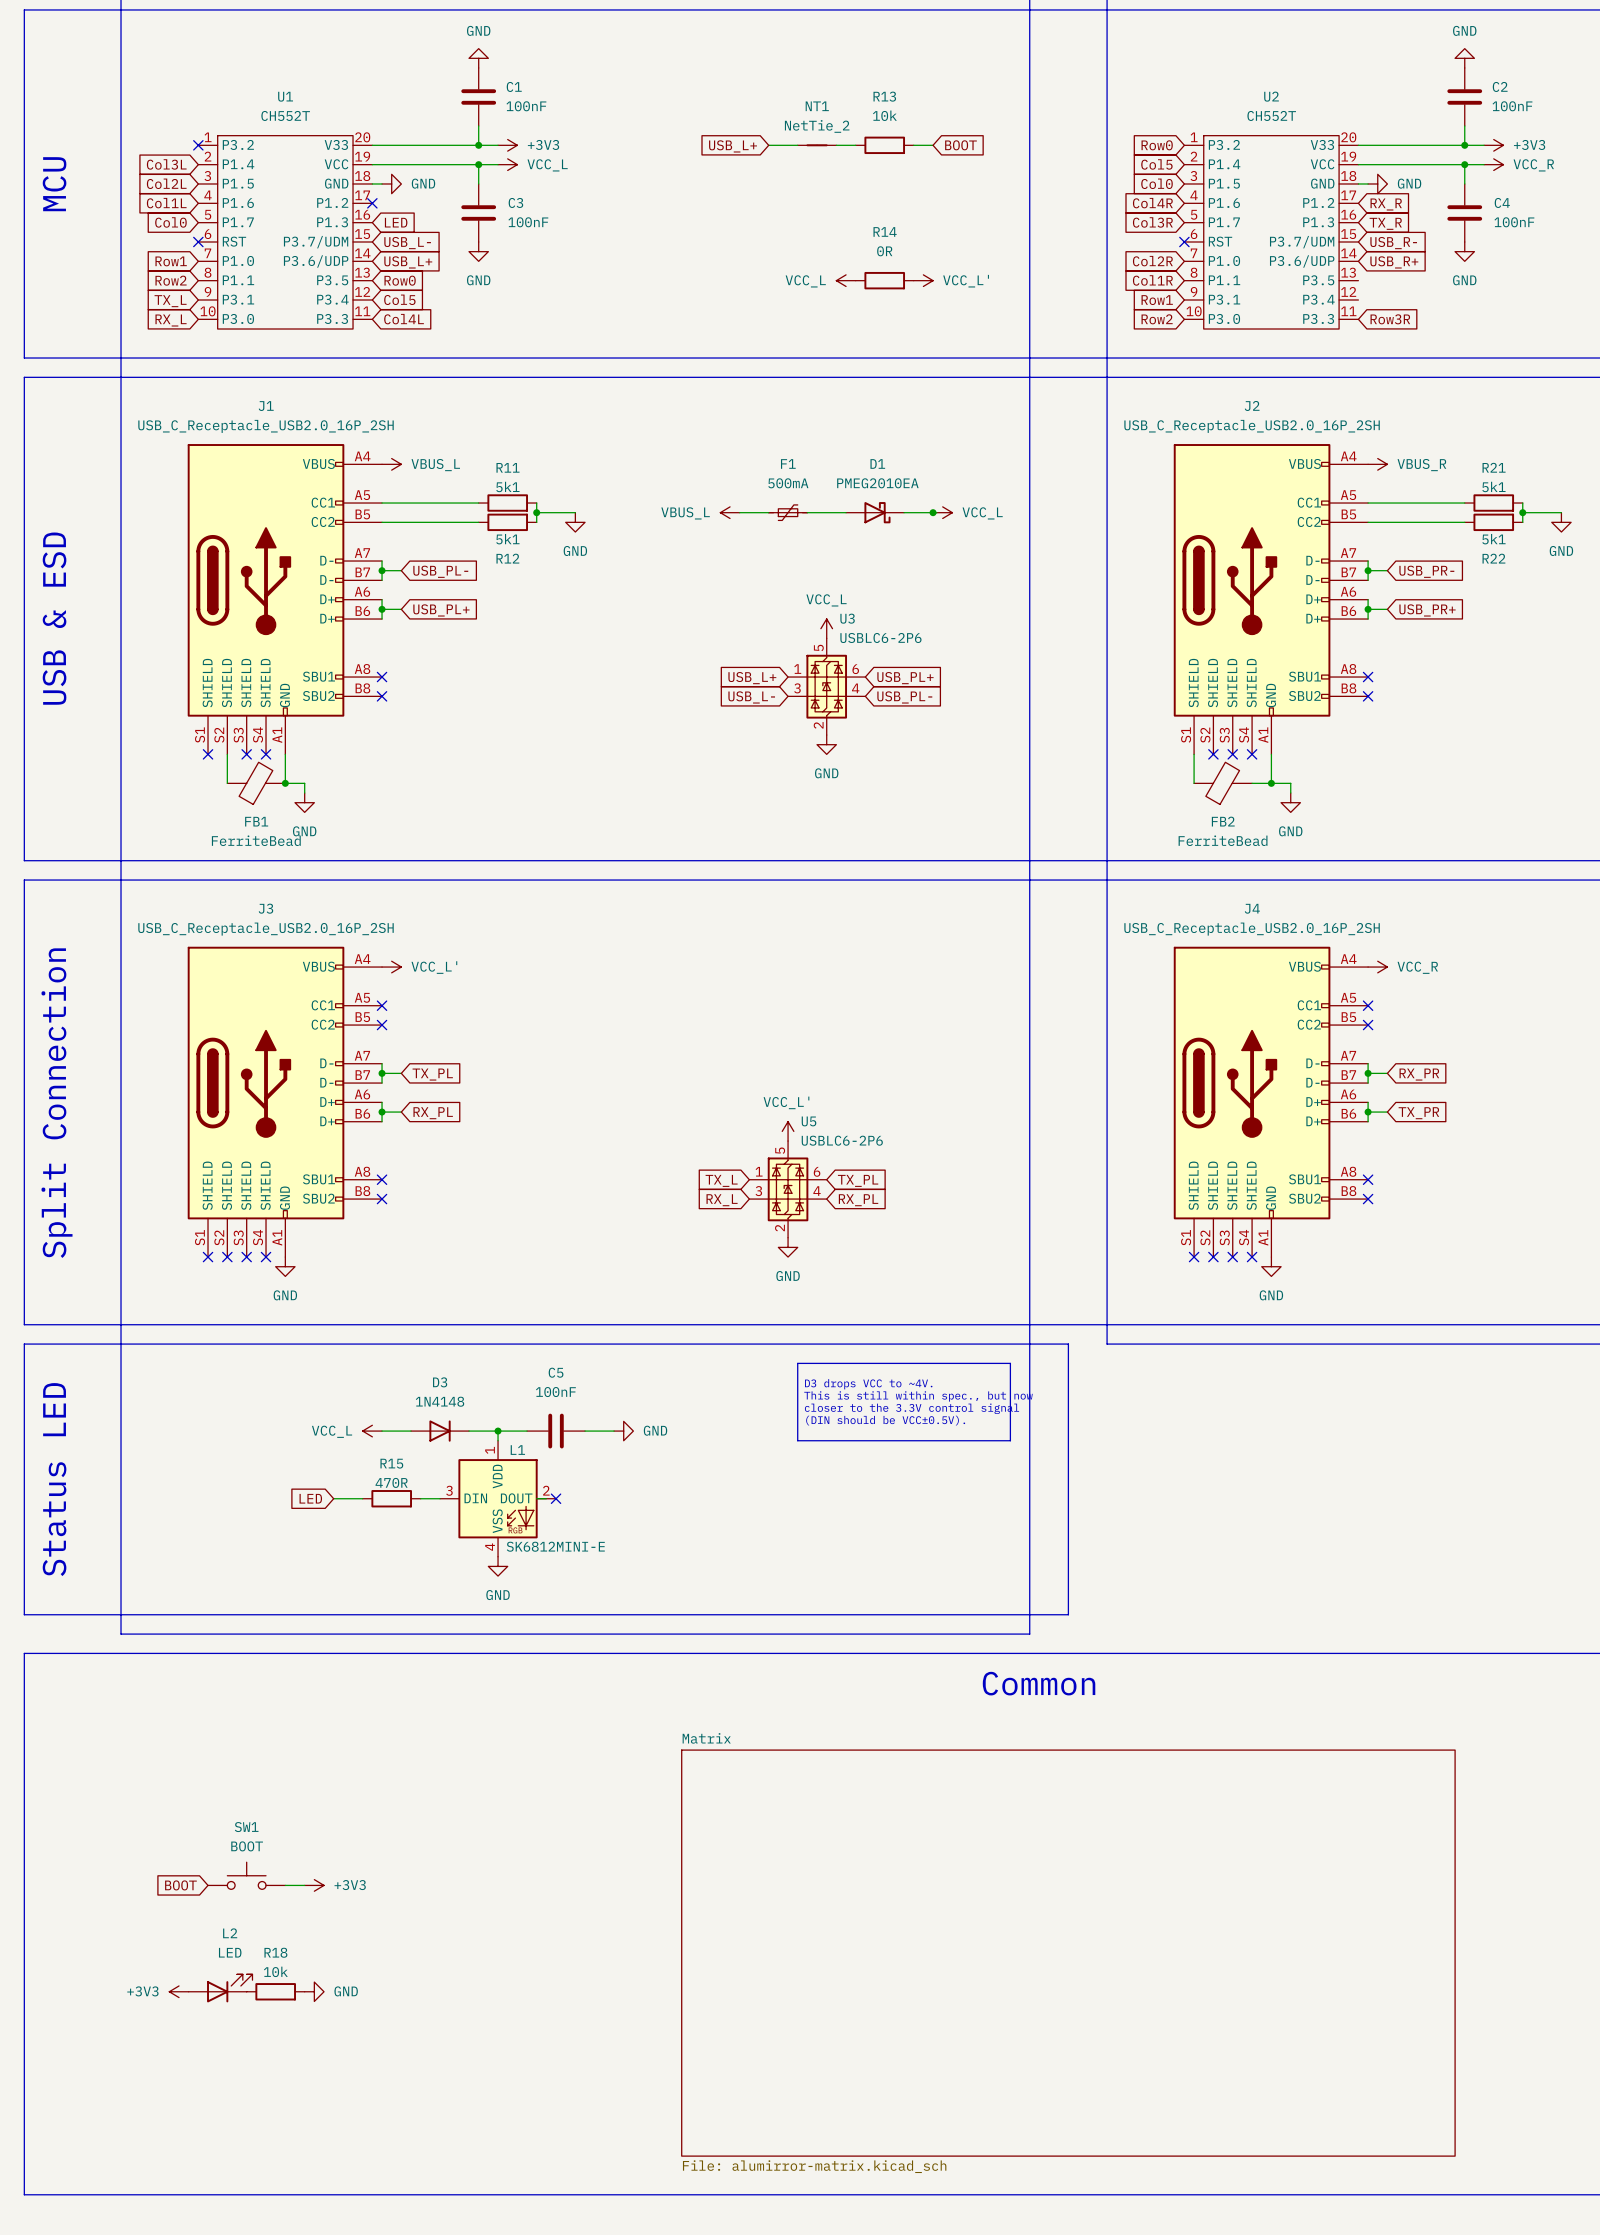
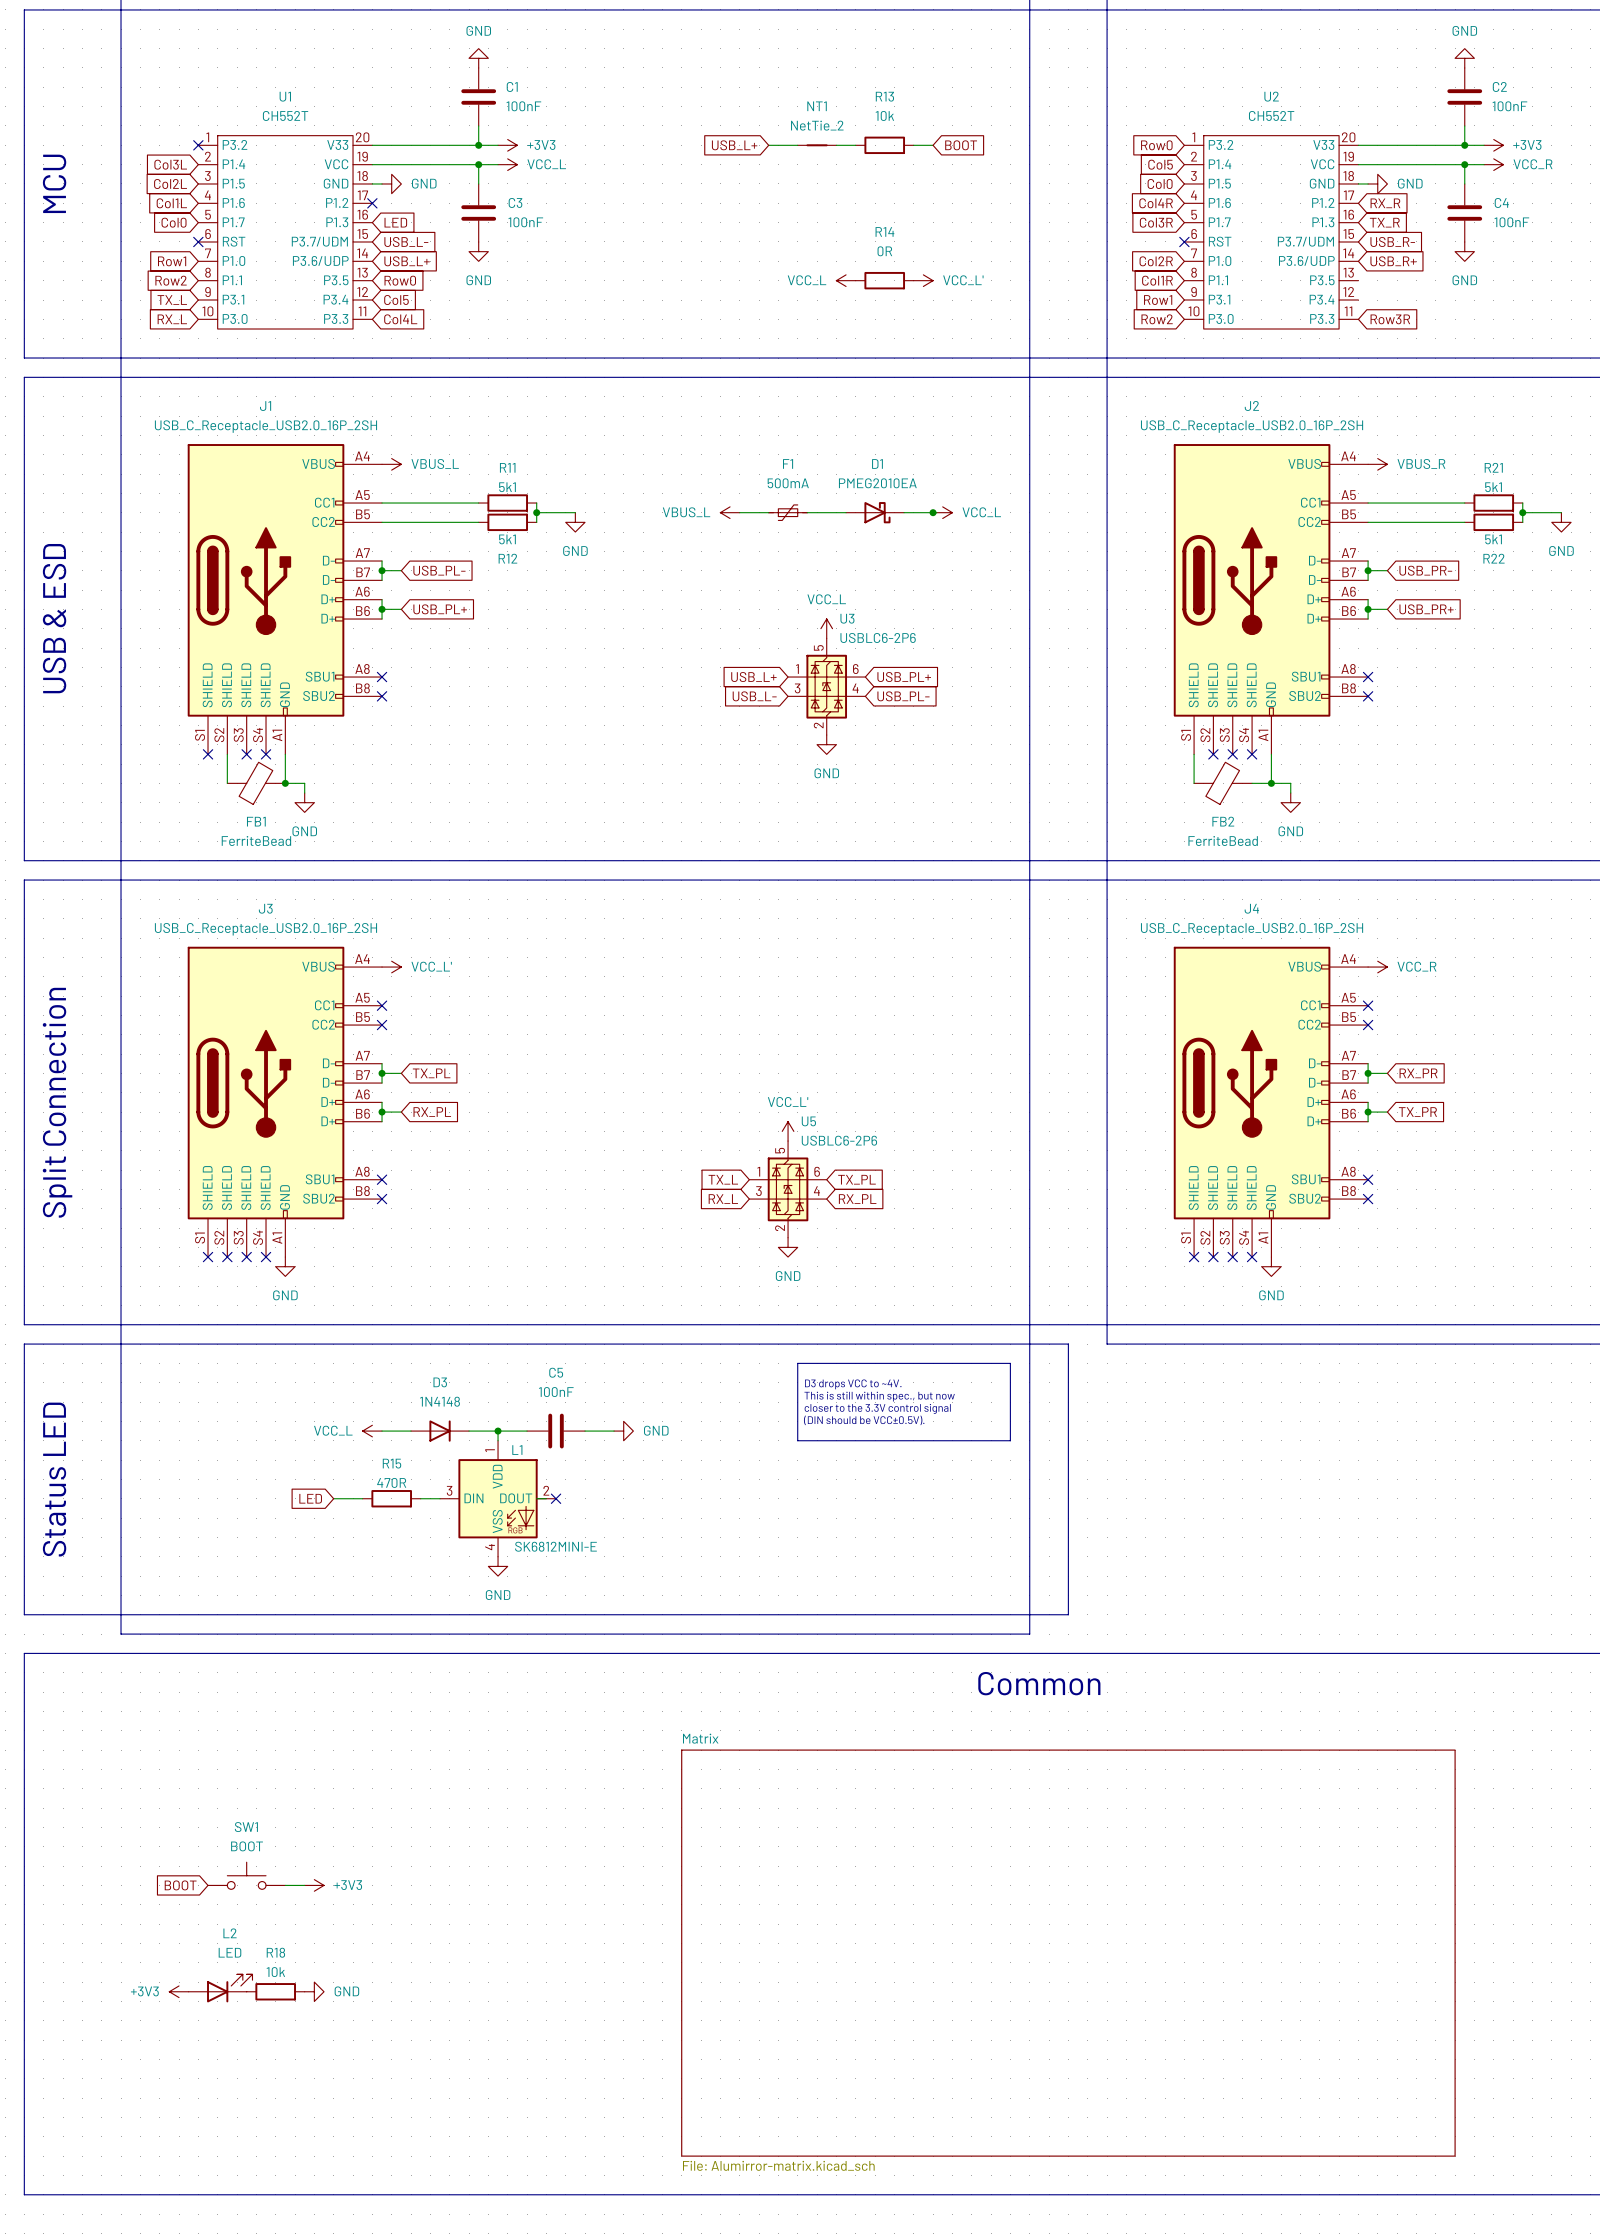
sheet Matrix value: File: alumirror-matrix.kicad_sch (814, 2166) -> File: Alumirror-matrix.kicad_sch (778, 2165)

